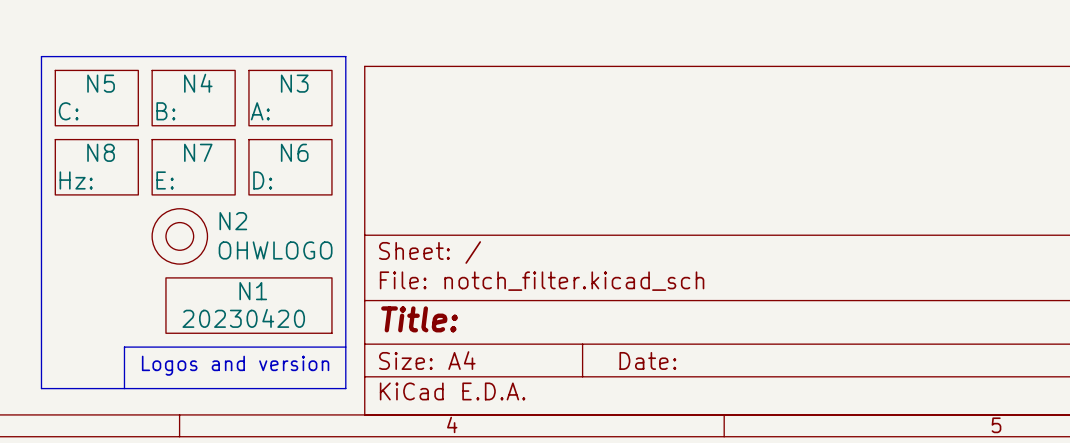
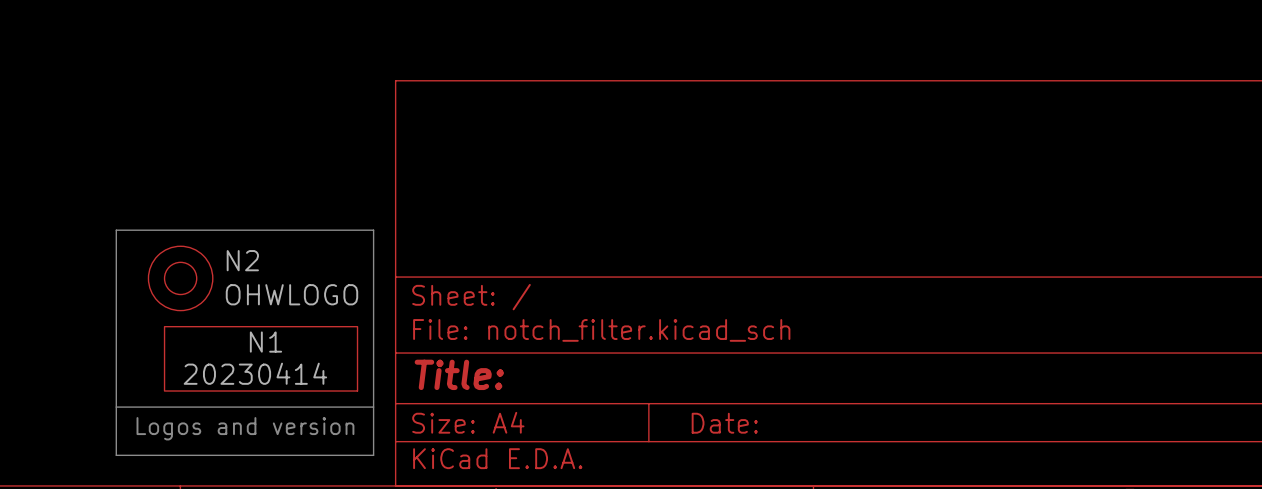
N5: C: (96, 98) -> none
N4: B: (193, 98) -> none
N3: A: (290, 98) -> none
N8: Hz: (96, 167) -> none
N7: E: (193, 167) -> none
N6: D: (290, 167) -> none
line: (345, 194) (345, 56) (41, 56) (41, 388) (124, 388) -> (373, 230) (116, 230) (116, 407)
N1 value: 20230420 (243, 318) -> 20230414 (255, 373)

